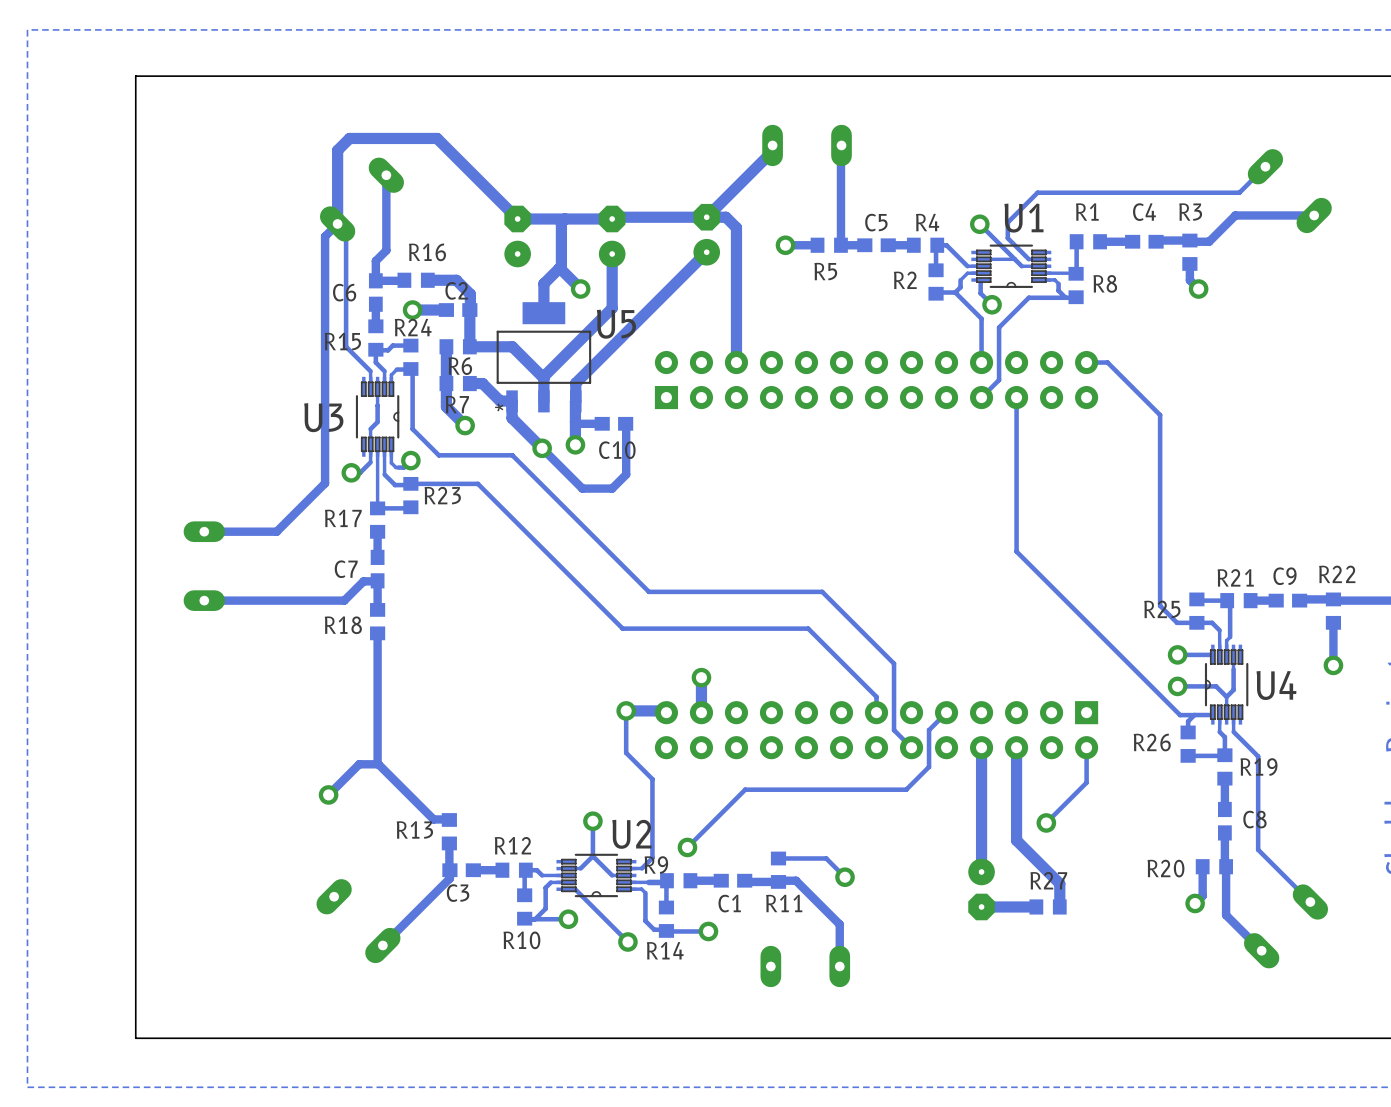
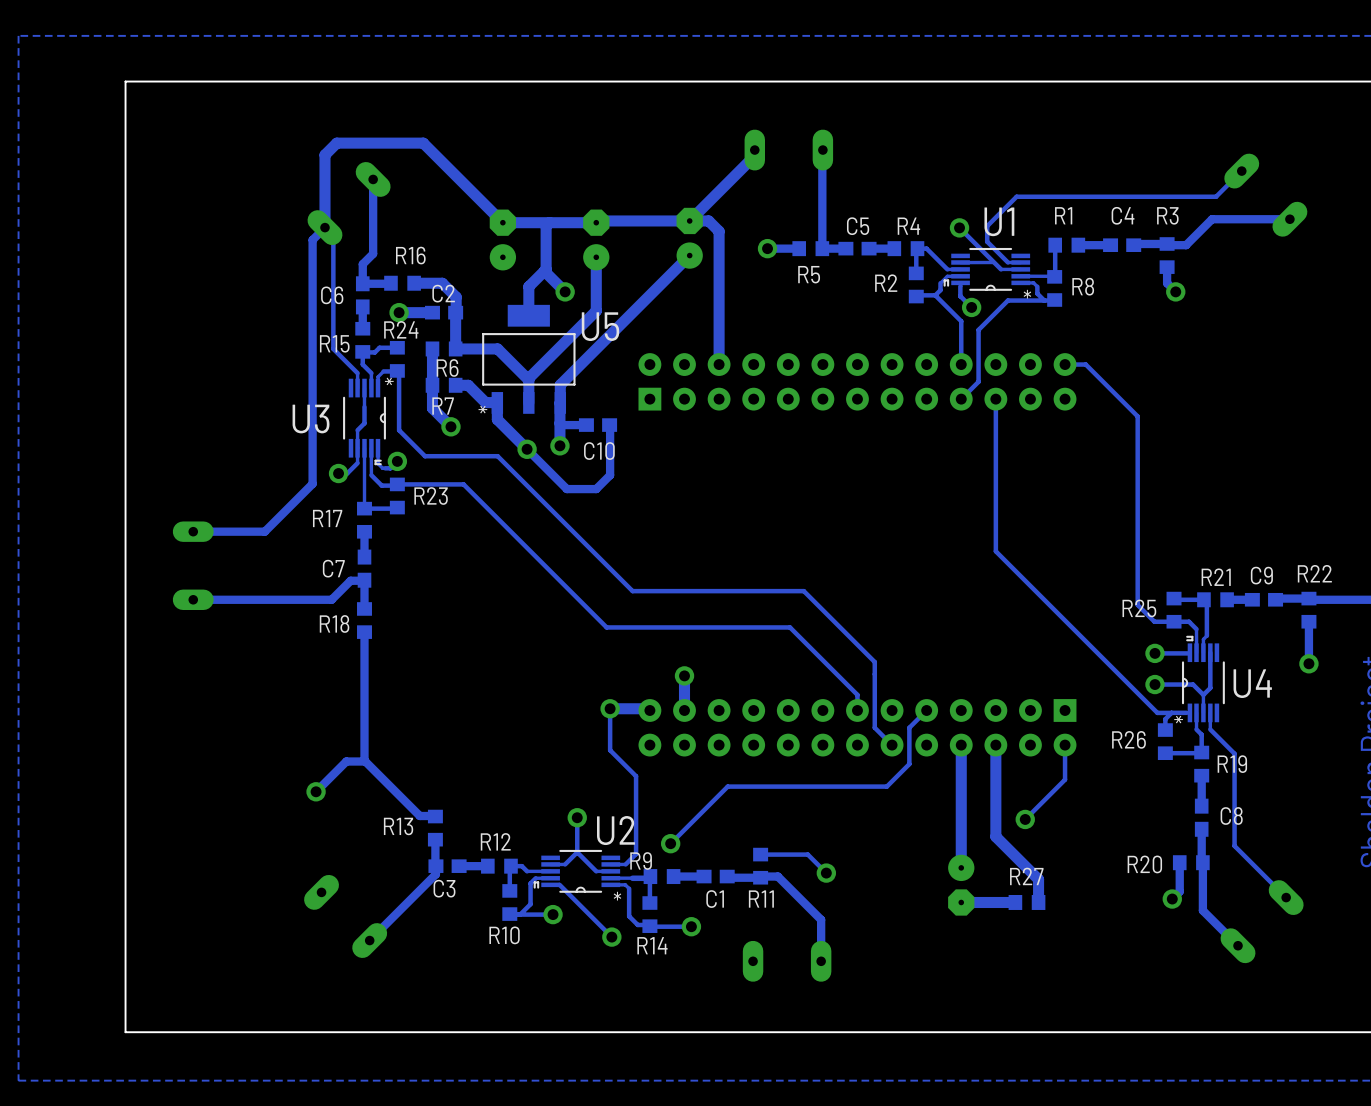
U1 footprint: [971, 244, 1052, 288] -> [943, 247, 1031, 291]
U3 footprint: [355, 376, 400, 457] -> [343, 378, 386, 466]
U4 footprint: [1204, 644, 1249, 725] -> [1181, 635, 1225, 723]
U2 footprint: [556, 853, 637, 898] -> [533, 849, 621, 893]

